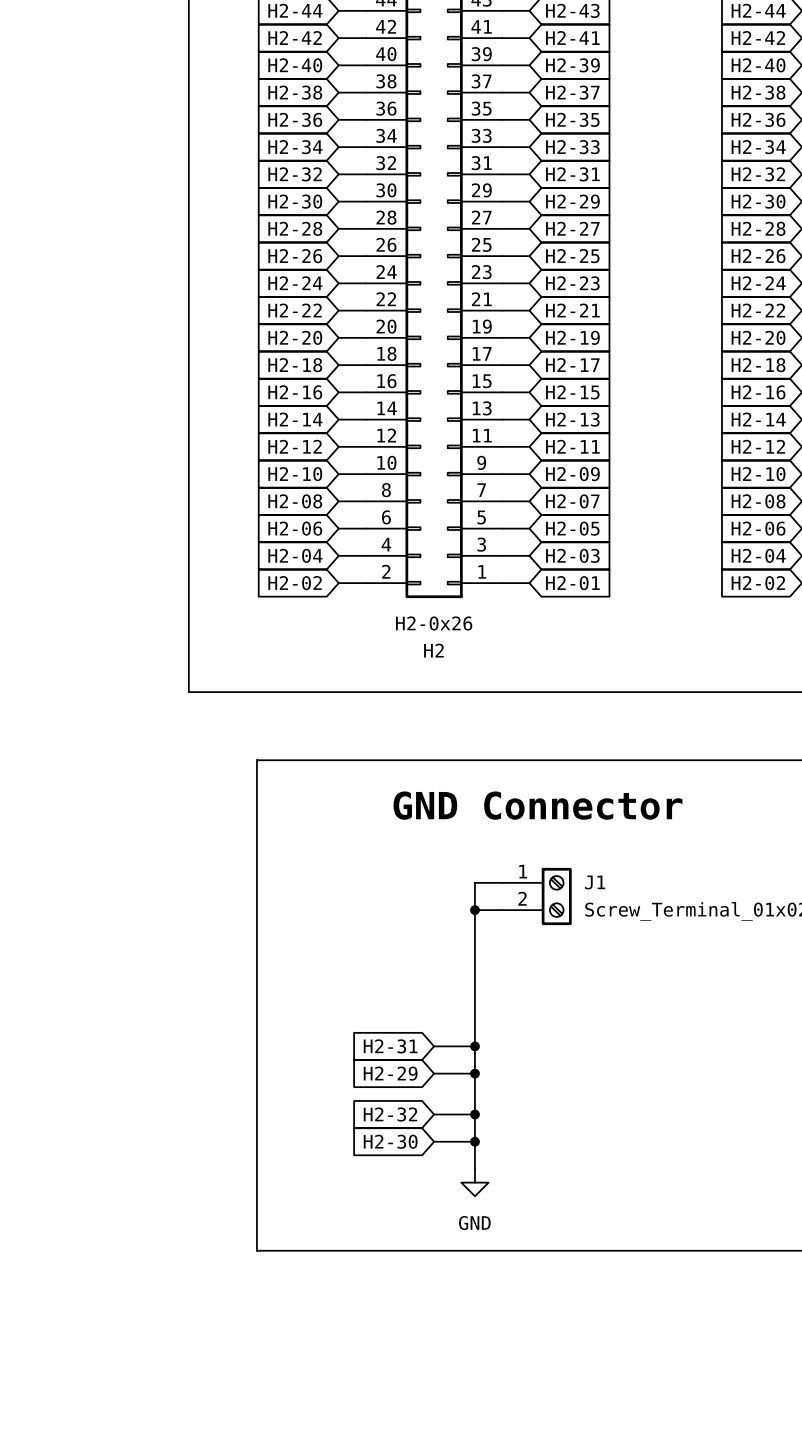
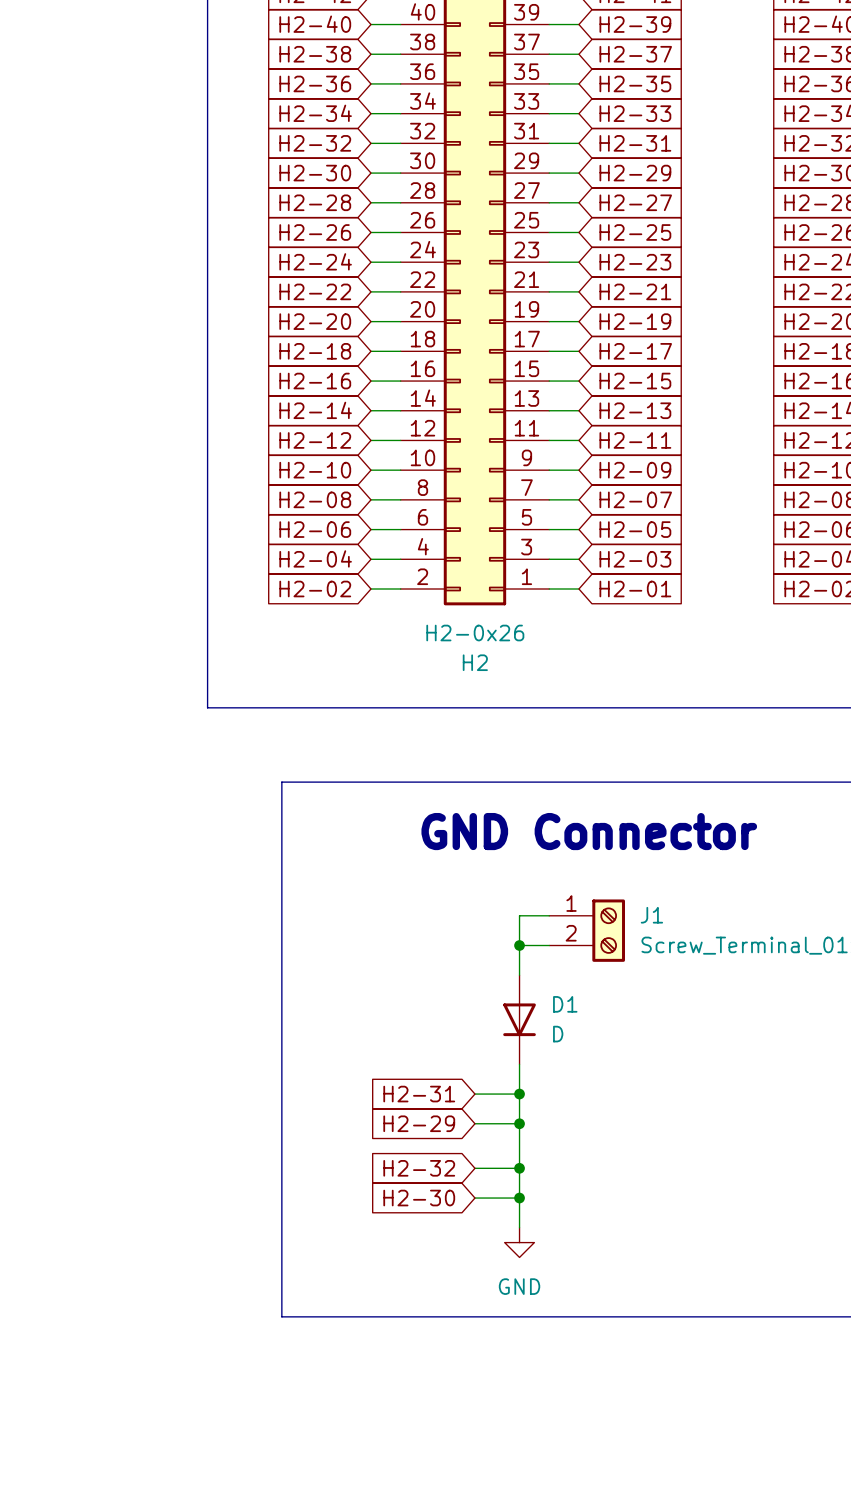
D1: none -> D (519, 1019)

